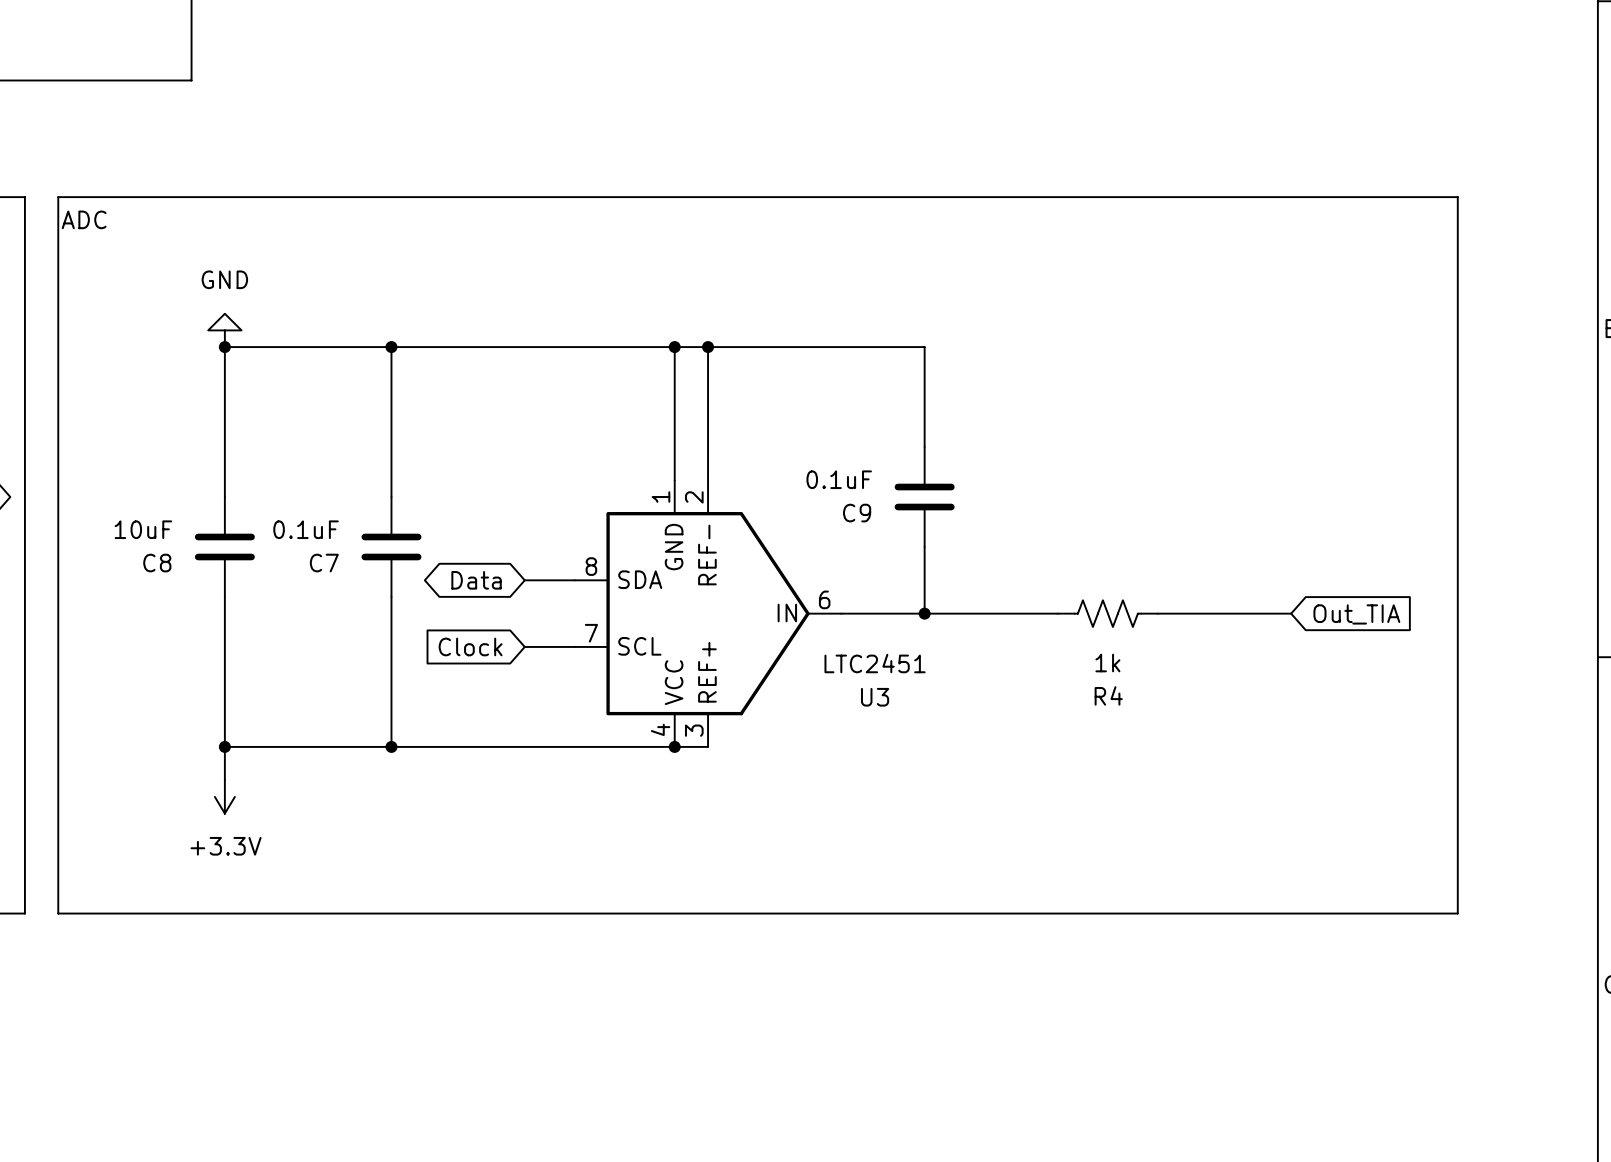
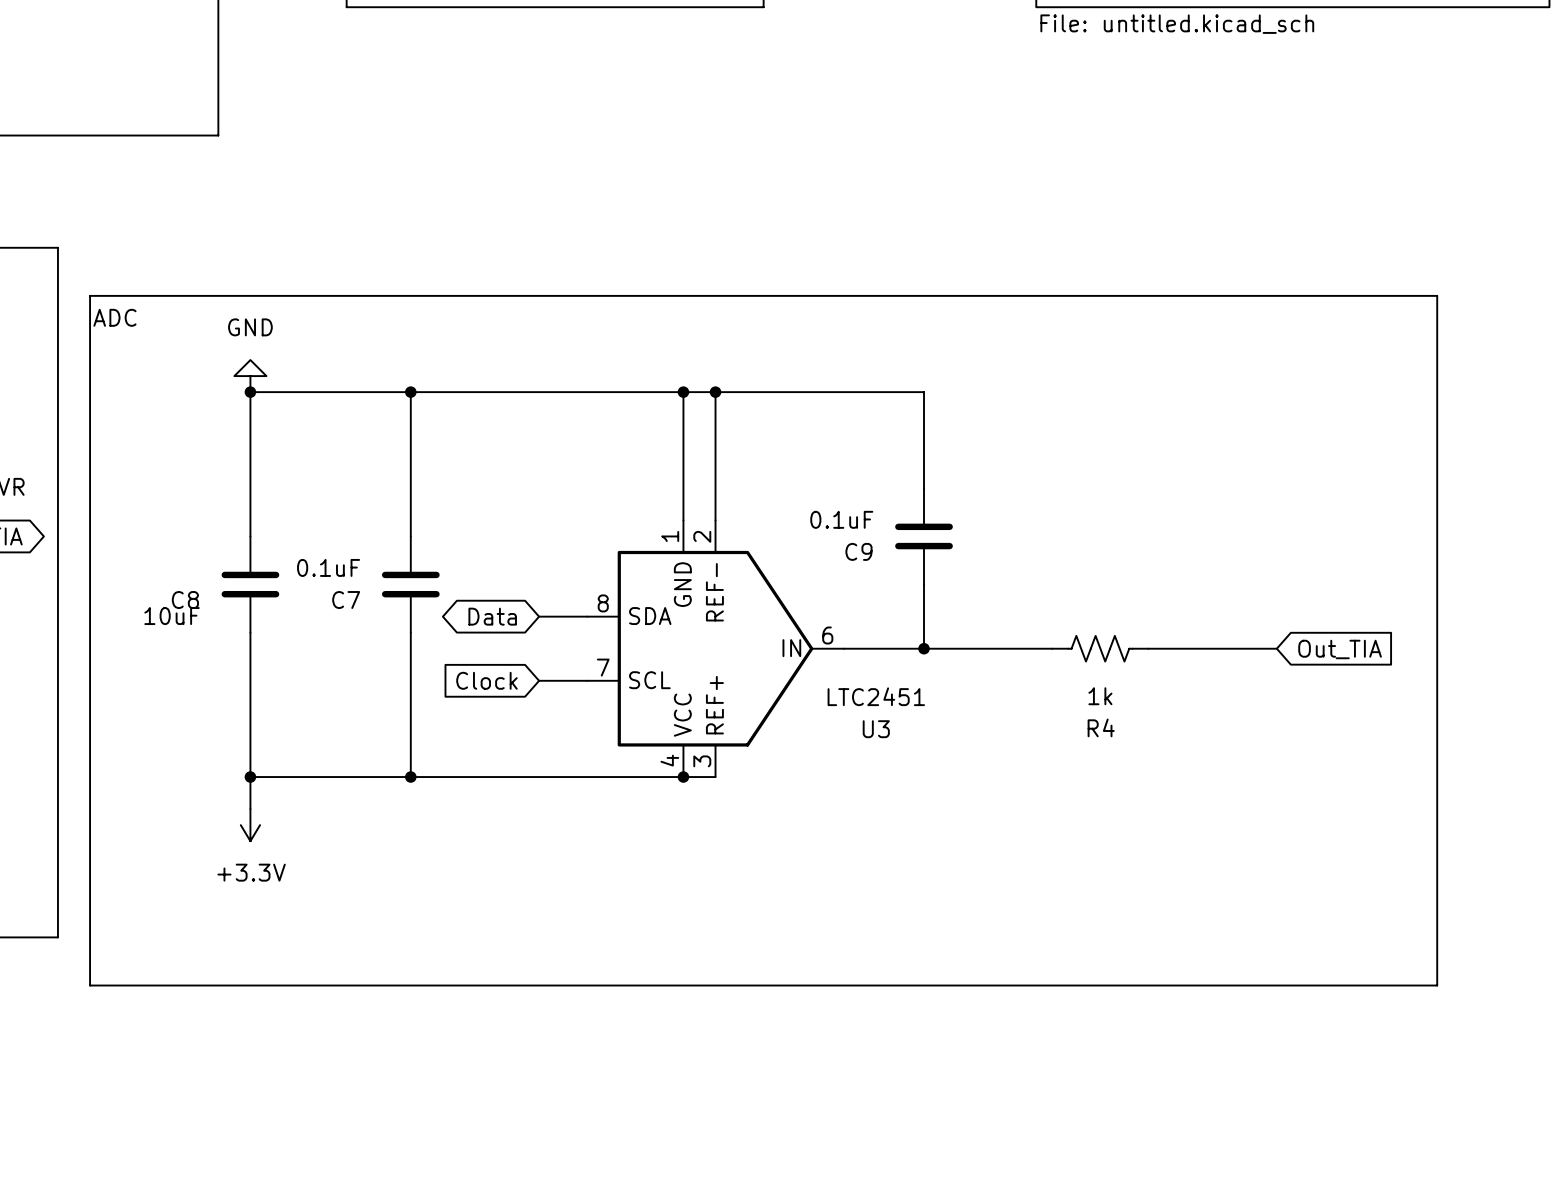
text position: ADC (84, 219) -> ADC (114, 317)
line: (58, 247) (58, 197) (1457, 197) (1457, 247) -> (90, 295) (1437, 295)
C8 value position: 10uF (143, 529) -> 10uF (172, 616)
line: (58, 913) (1457, 913) -> (90, 937) (90, 985) (1437, 985) (1437, 937)

